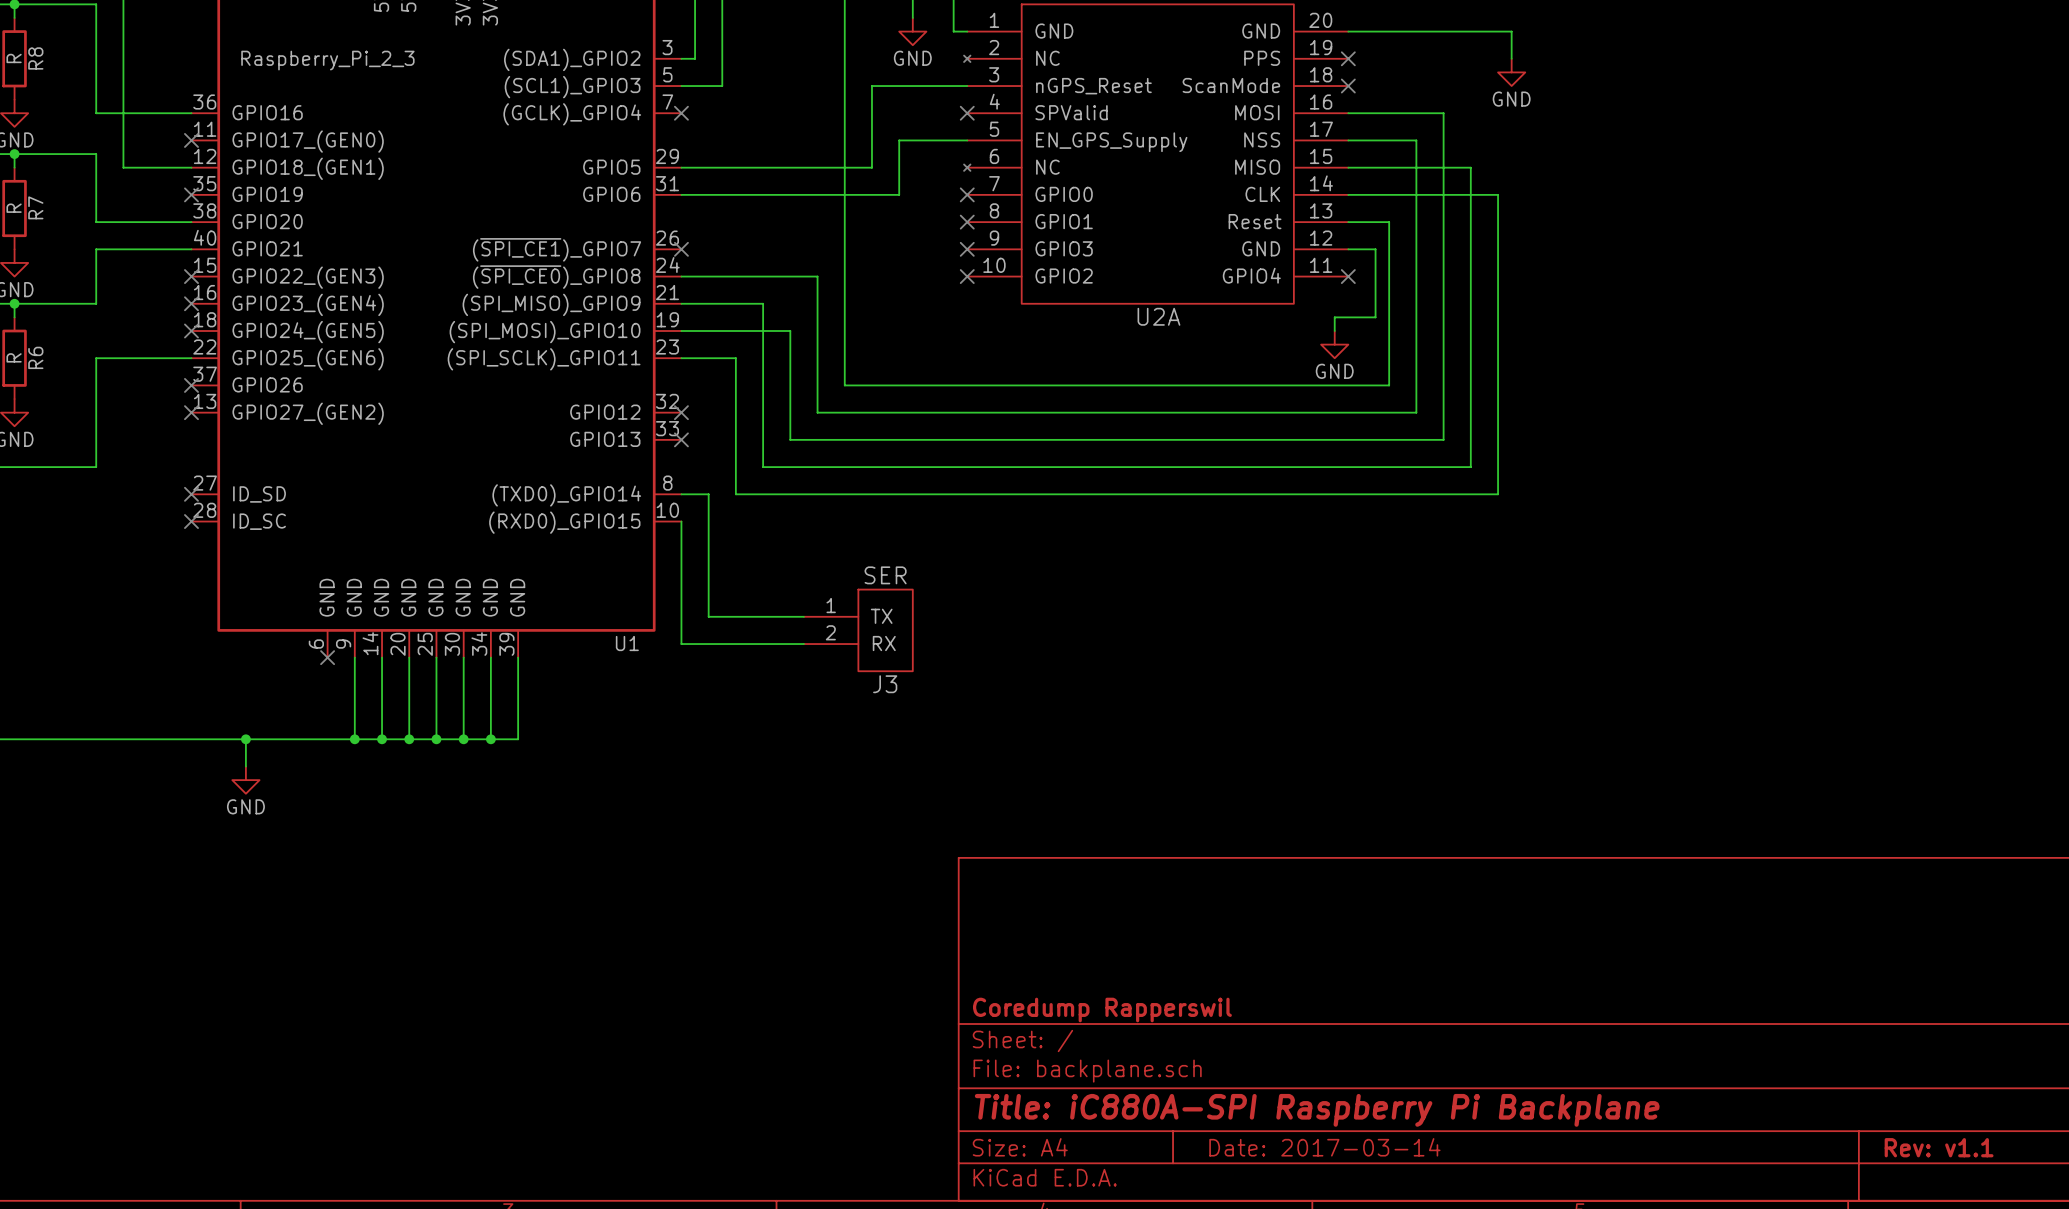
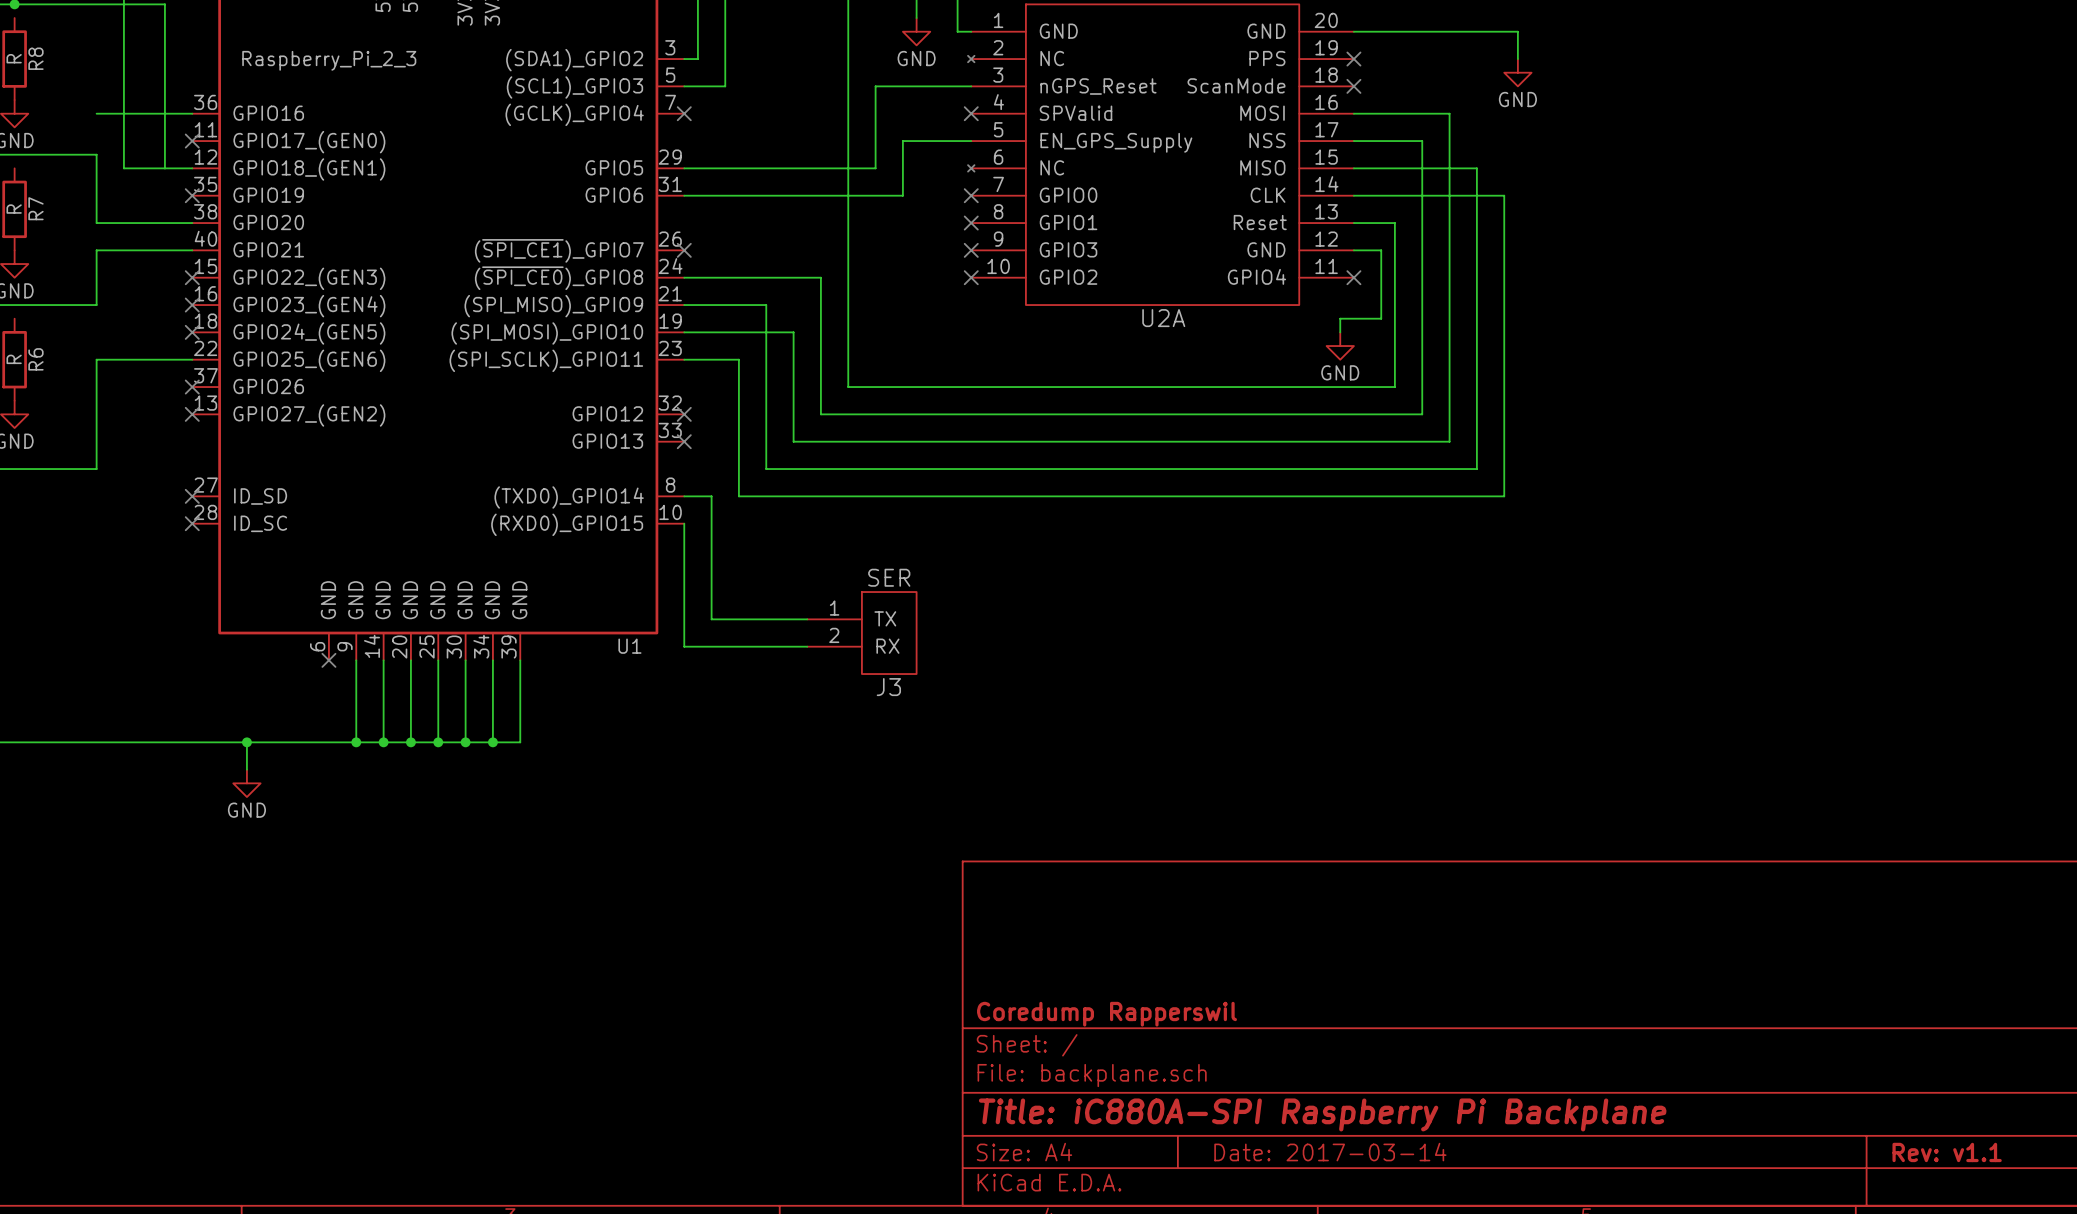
wire: (14, 4) (14, 17) -> none
wire: (96, 4) (96, 113) -> (96, 4) (164, 4) (164, 168)
wire: (14, 154) (14, 167) -> none
junction: (14, 154) -> none
wire: (14, 303) (14, 317) -> none
junction: (14, 303) -> none

